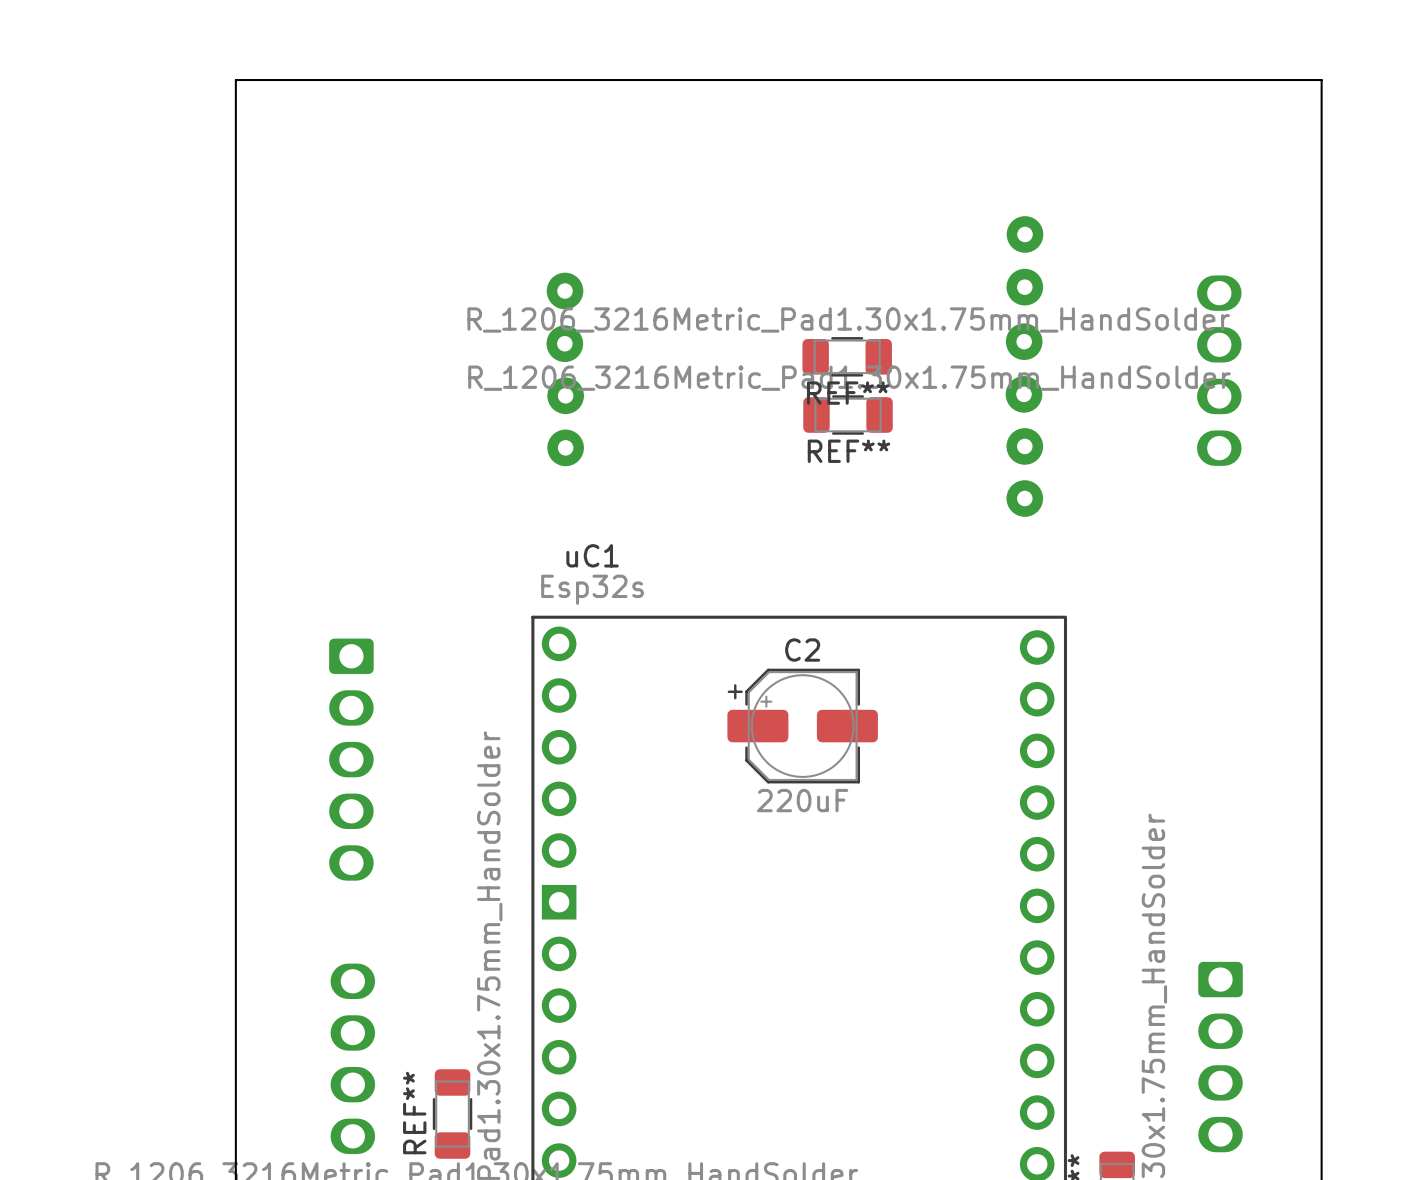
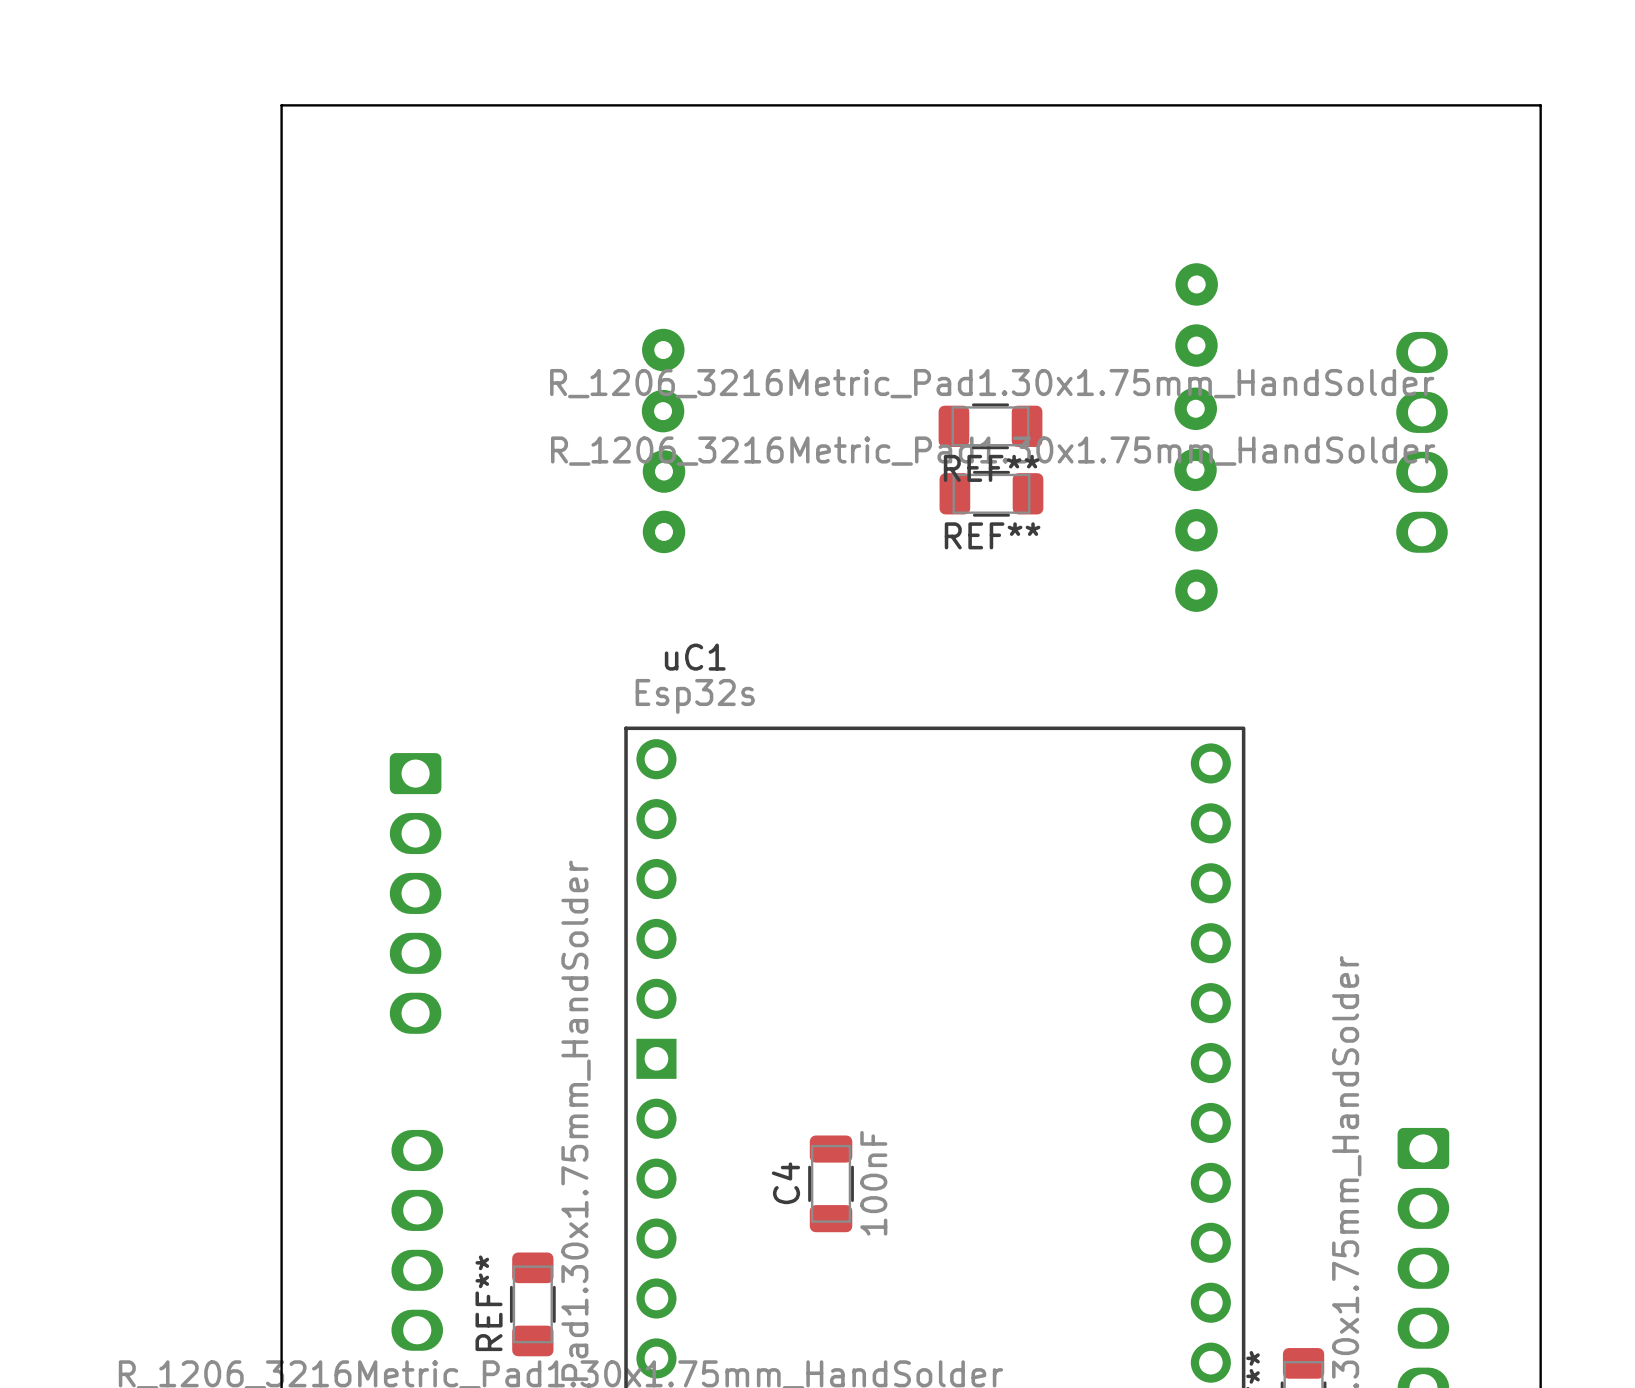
C2: 220uF (802, 726) -> none
C4: none -> 100nF (831, 1183)

